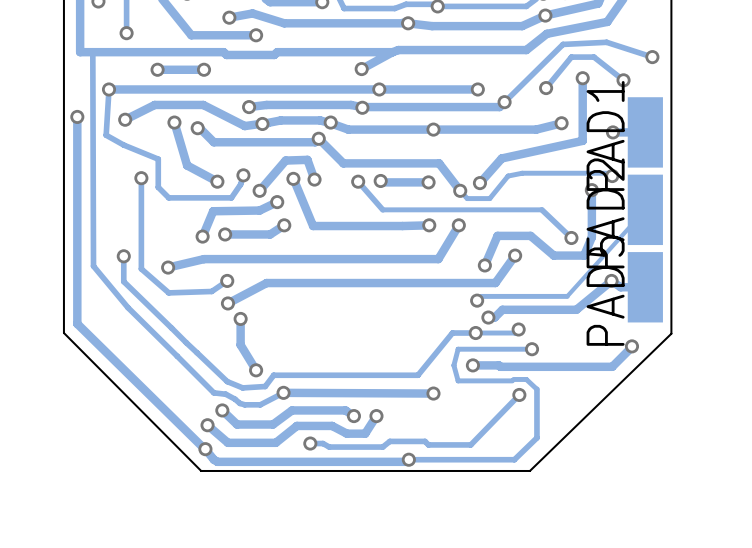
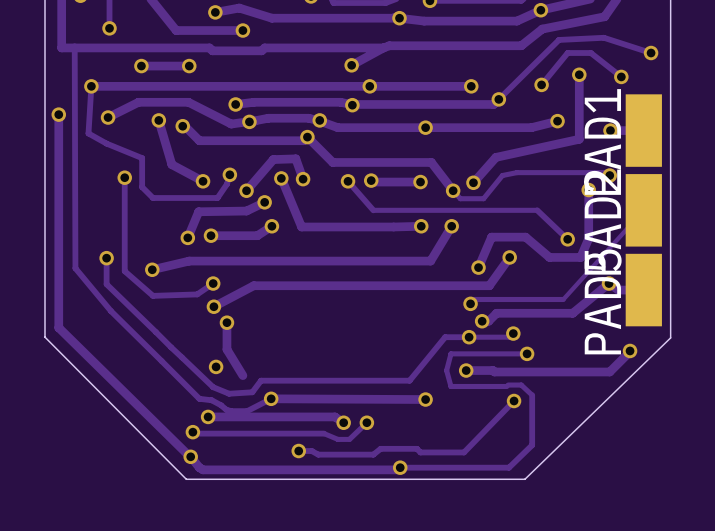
via position: (256, 370) -> (216, 366)
track: (292, 410) (273, 424) (237, 424) (222, 410) -> (279, 416) (208, 416)
track: (376, 416) (365, 433) (346, 433) (332, 425) (296, 425) (275, 442) (227, 442) (207, 425) -> (366, 422) (349, 439) (337, 439) (324, 433) (192, 432)

